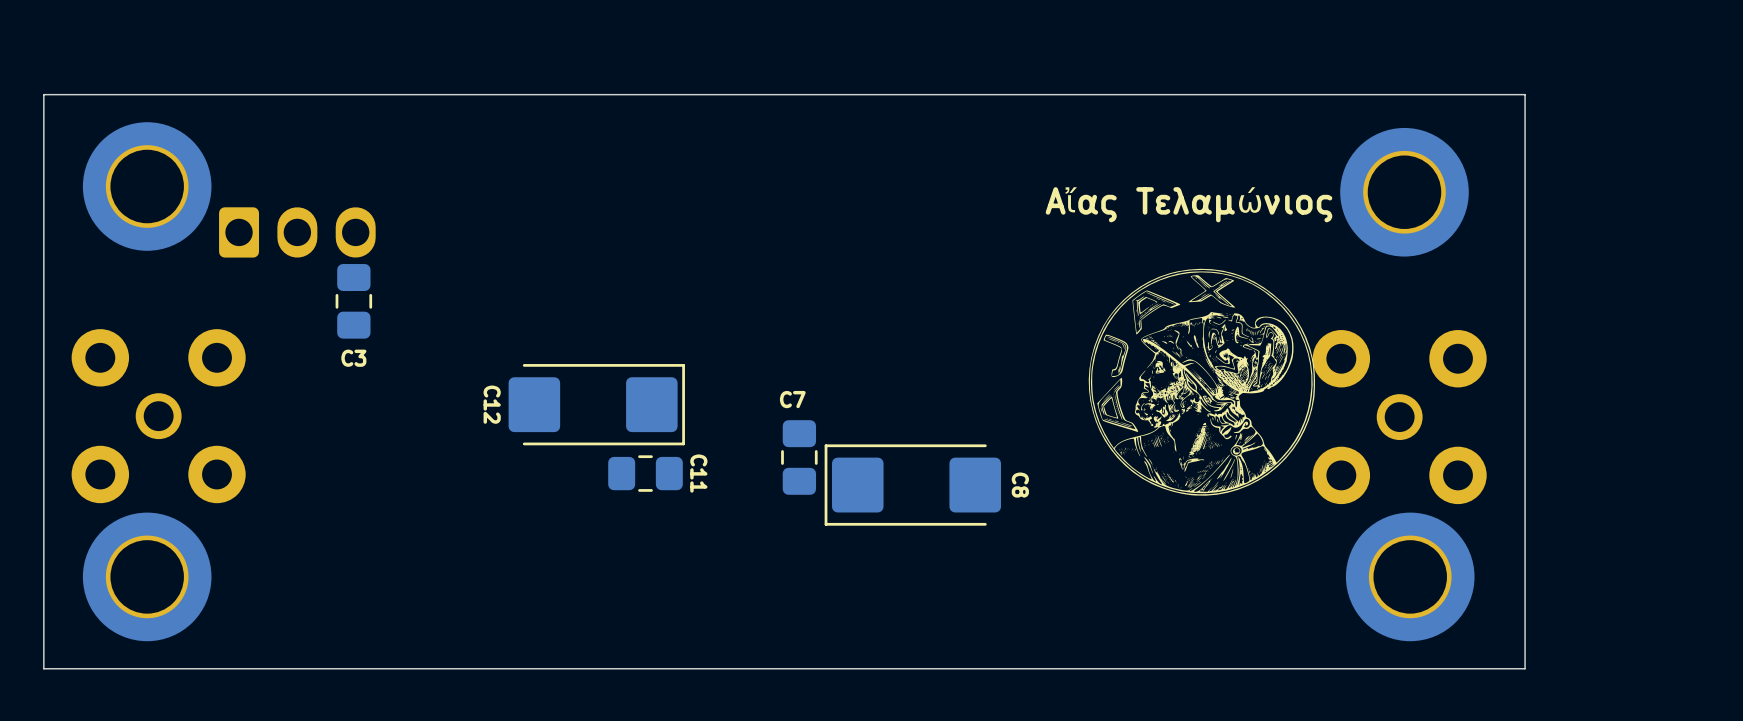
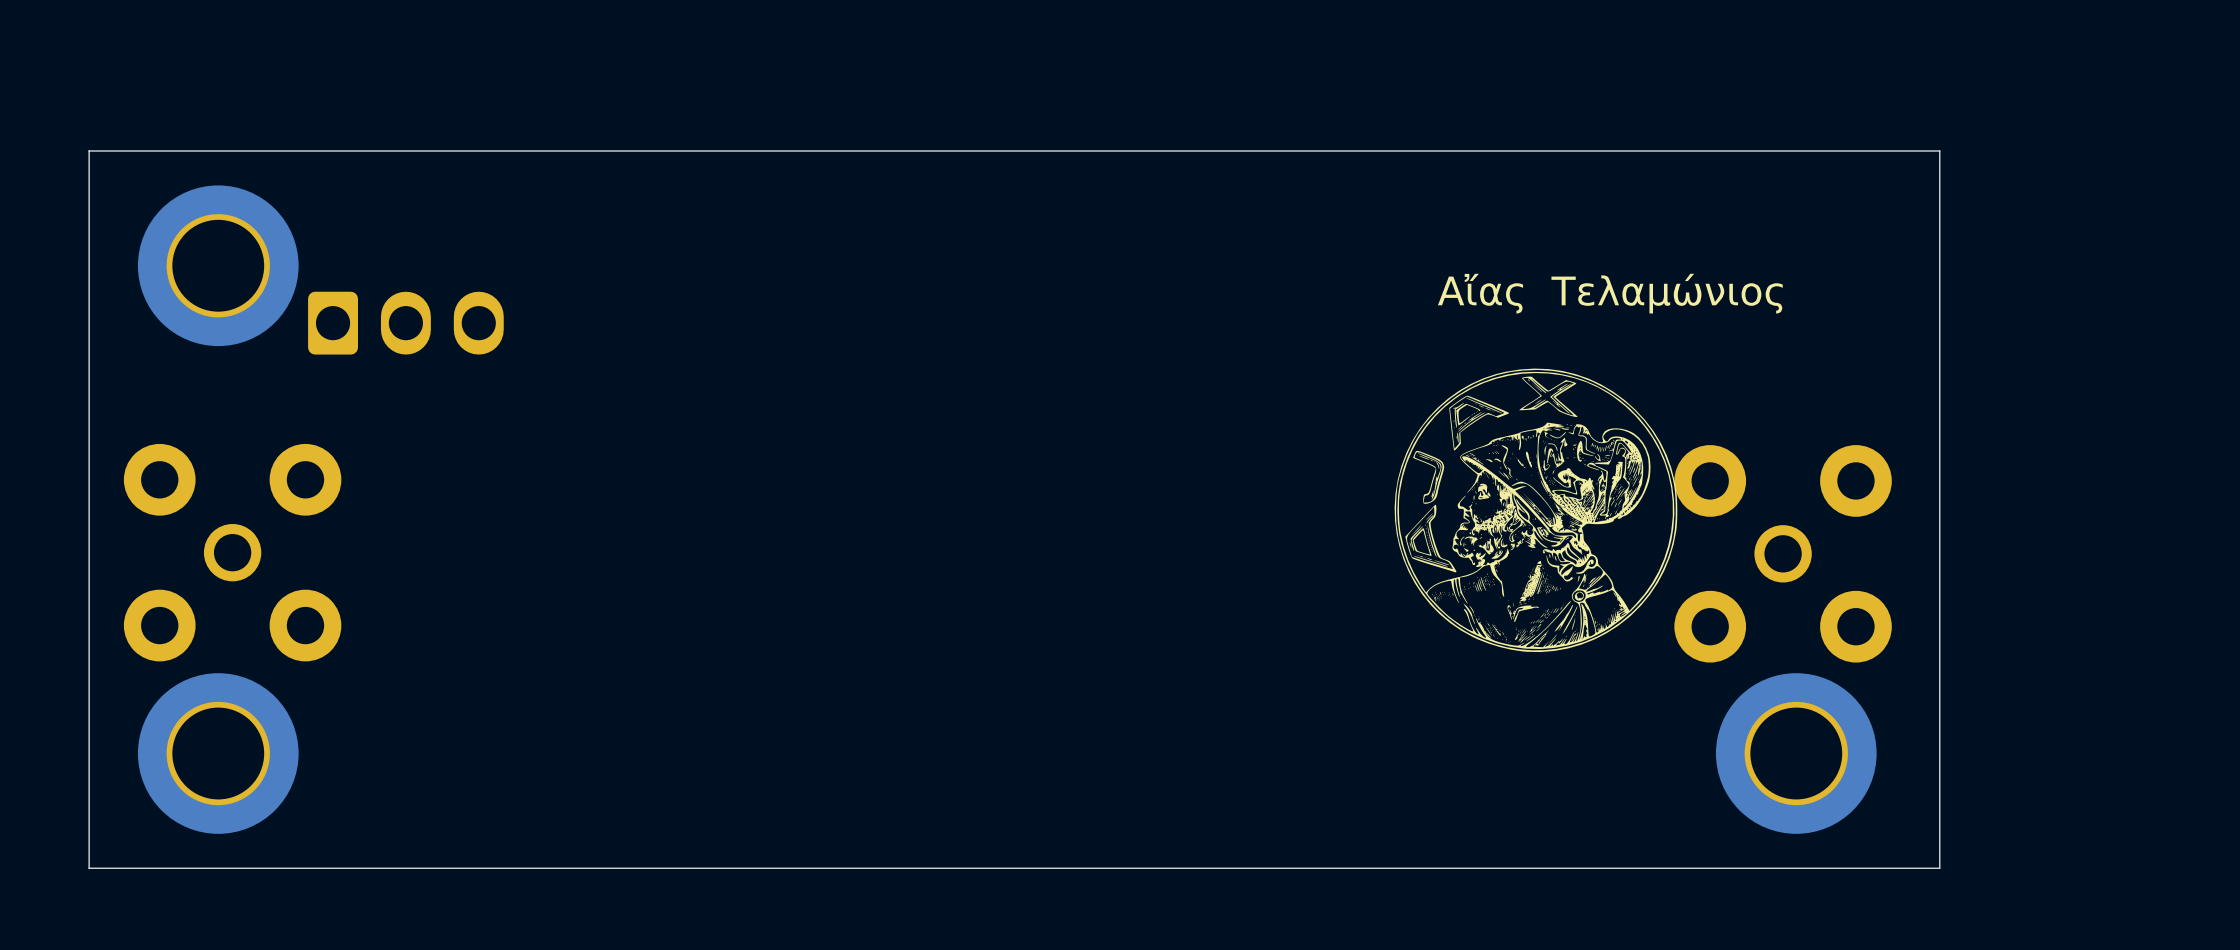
part: (1404, 192) -> none
text position: Αἴας Τελαμώνιος (1189, 203) -> Αἴας Τελαμώνιος (1610, 293)
C3: (353, 301) -> none
C12: (596, 404) -> none
C7: (799, 457) -> none
C11: (645, 473) -> none
C8: (912, 485) -> none

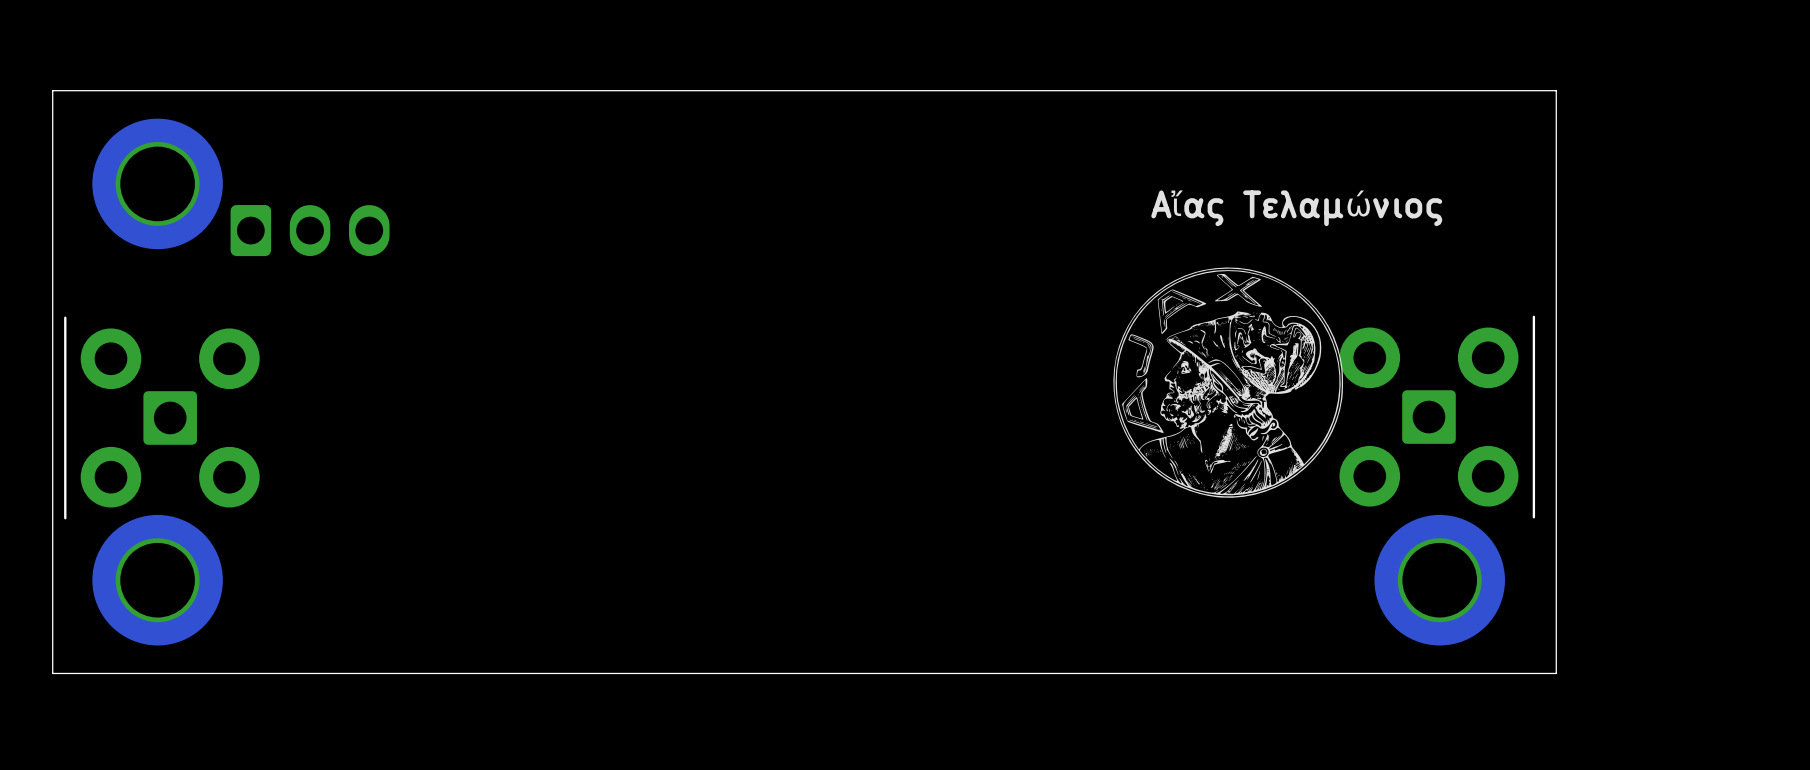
part footprint: [123, 443, 342, 662] -> [64, 316, 260, 520]
part footprint: [1674, 445, 1892, 663] -> [1339, 315, 1536, 519]

